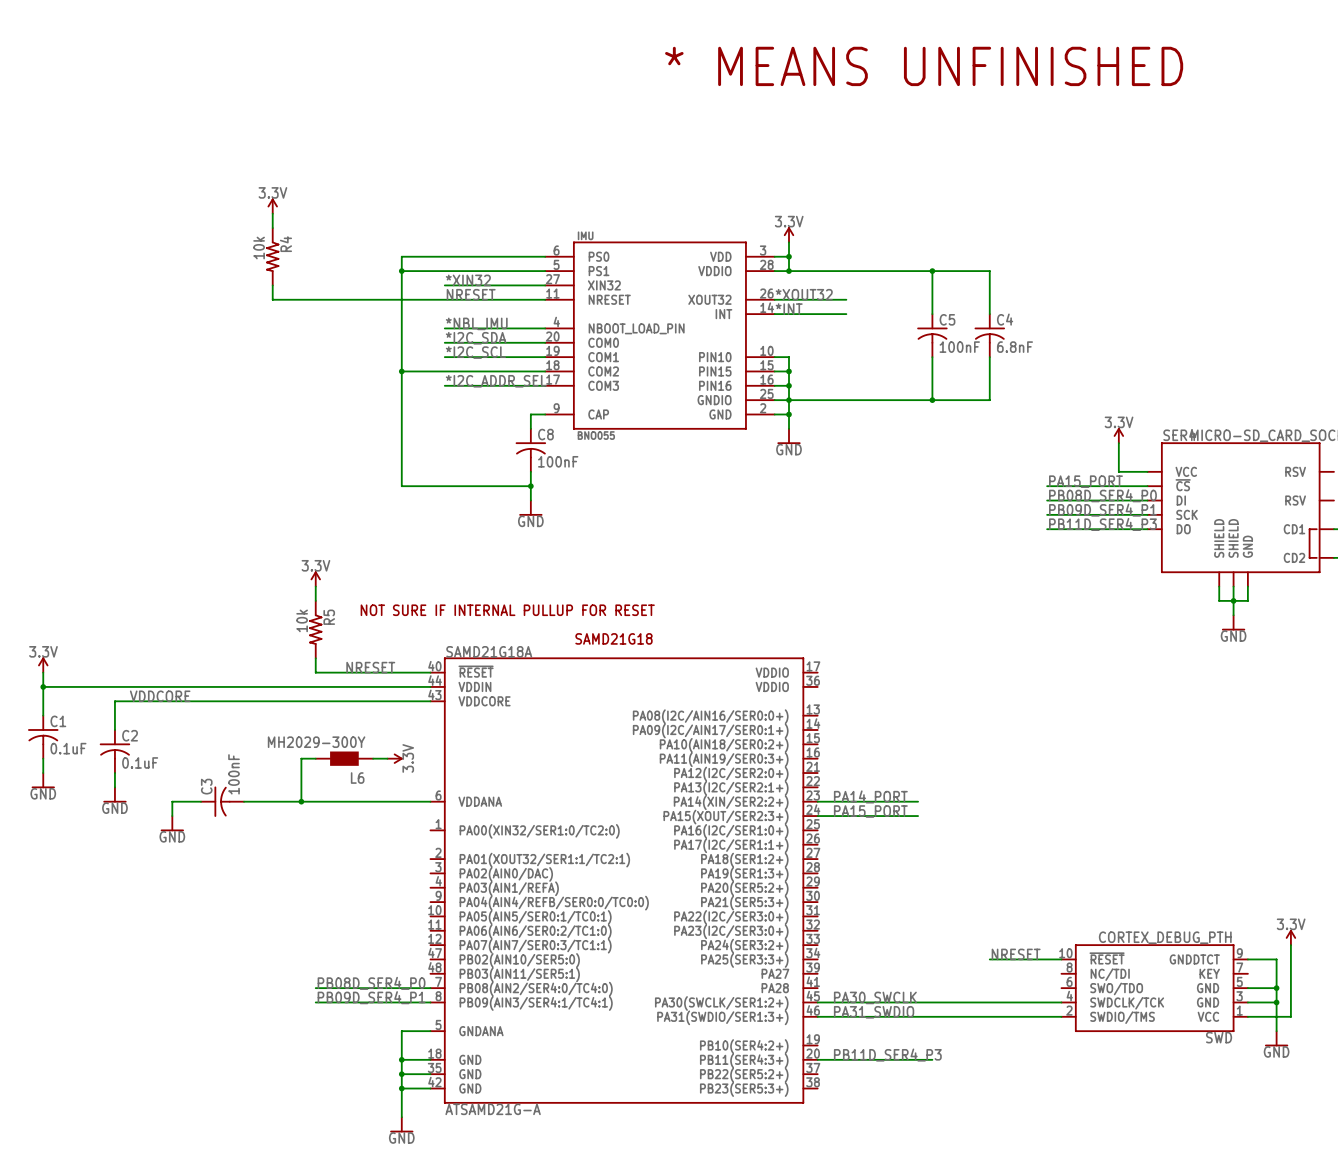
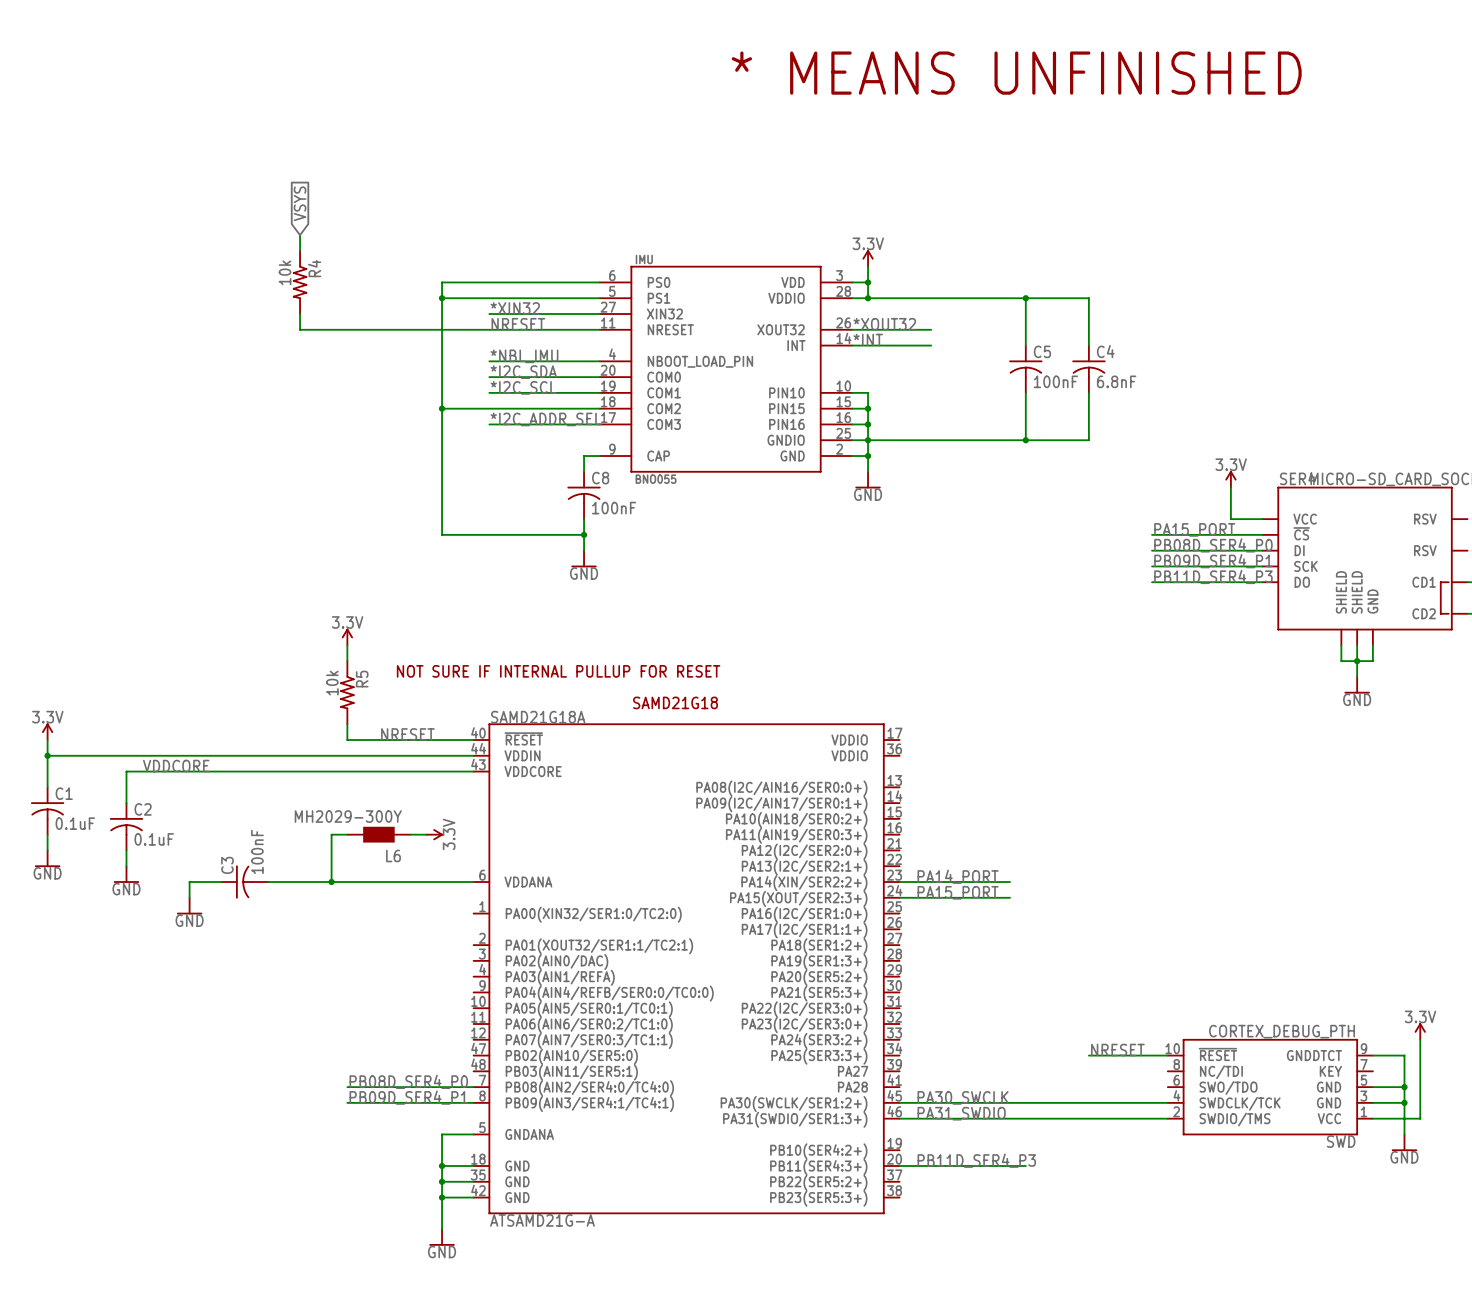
global label: none -> VSYS (300, 203)
power symbol: 3.3V (272, 206) -> none

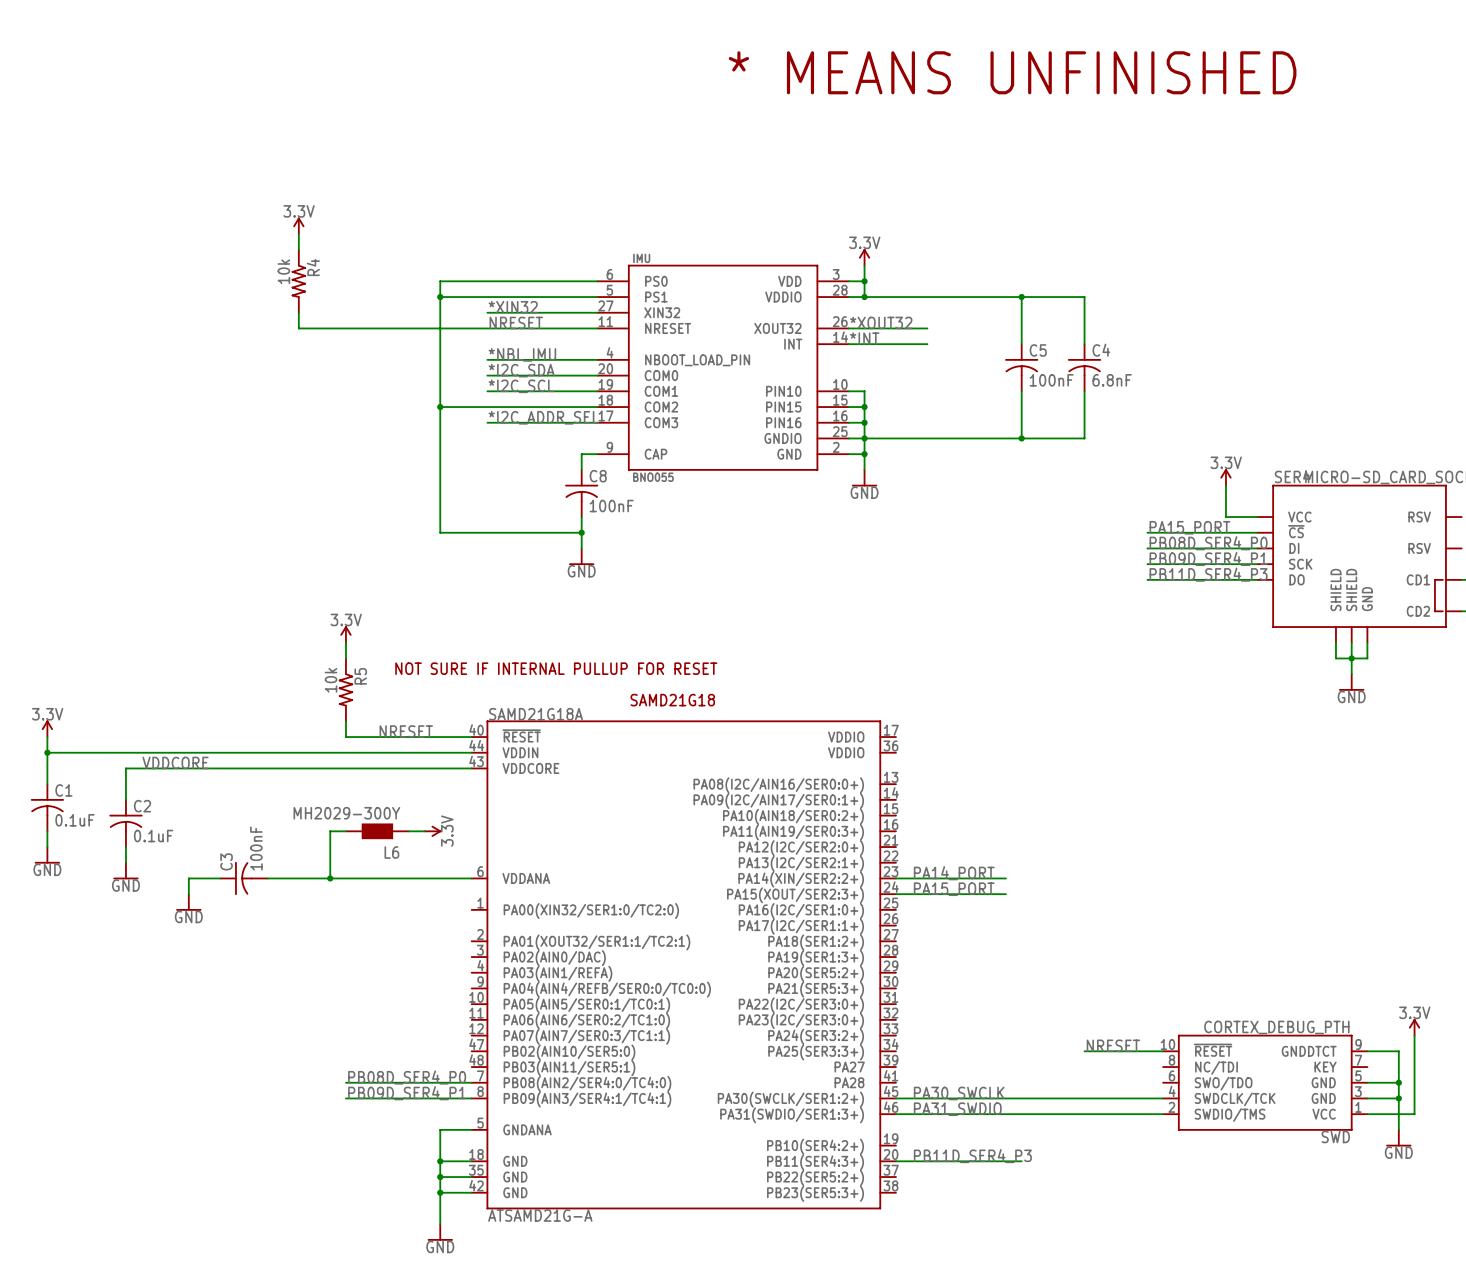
global label: VSYS (300, 203) -> none
power symbol: none -> 3.3V (298, 225)

